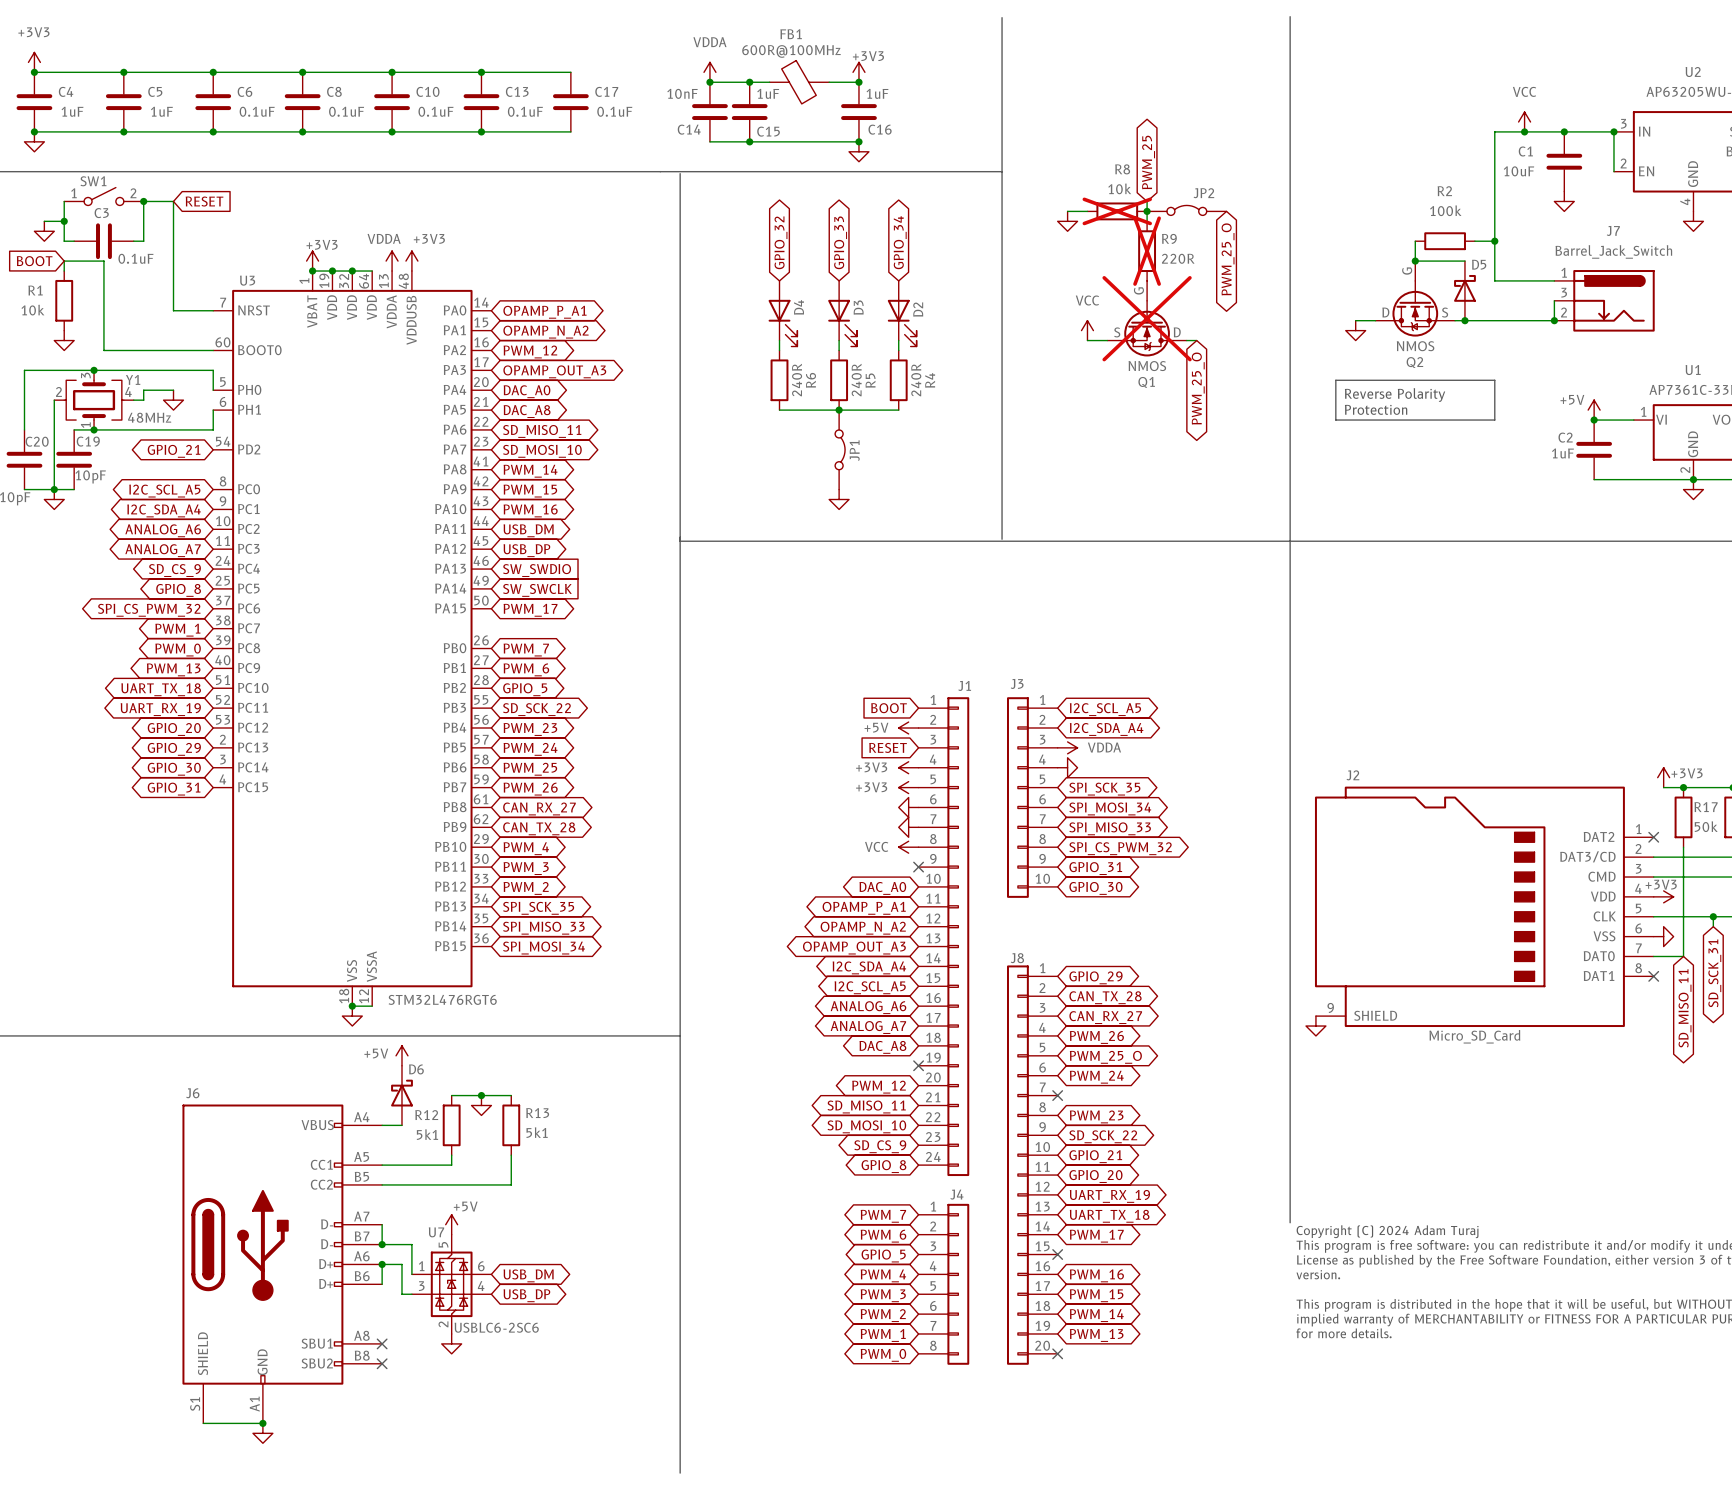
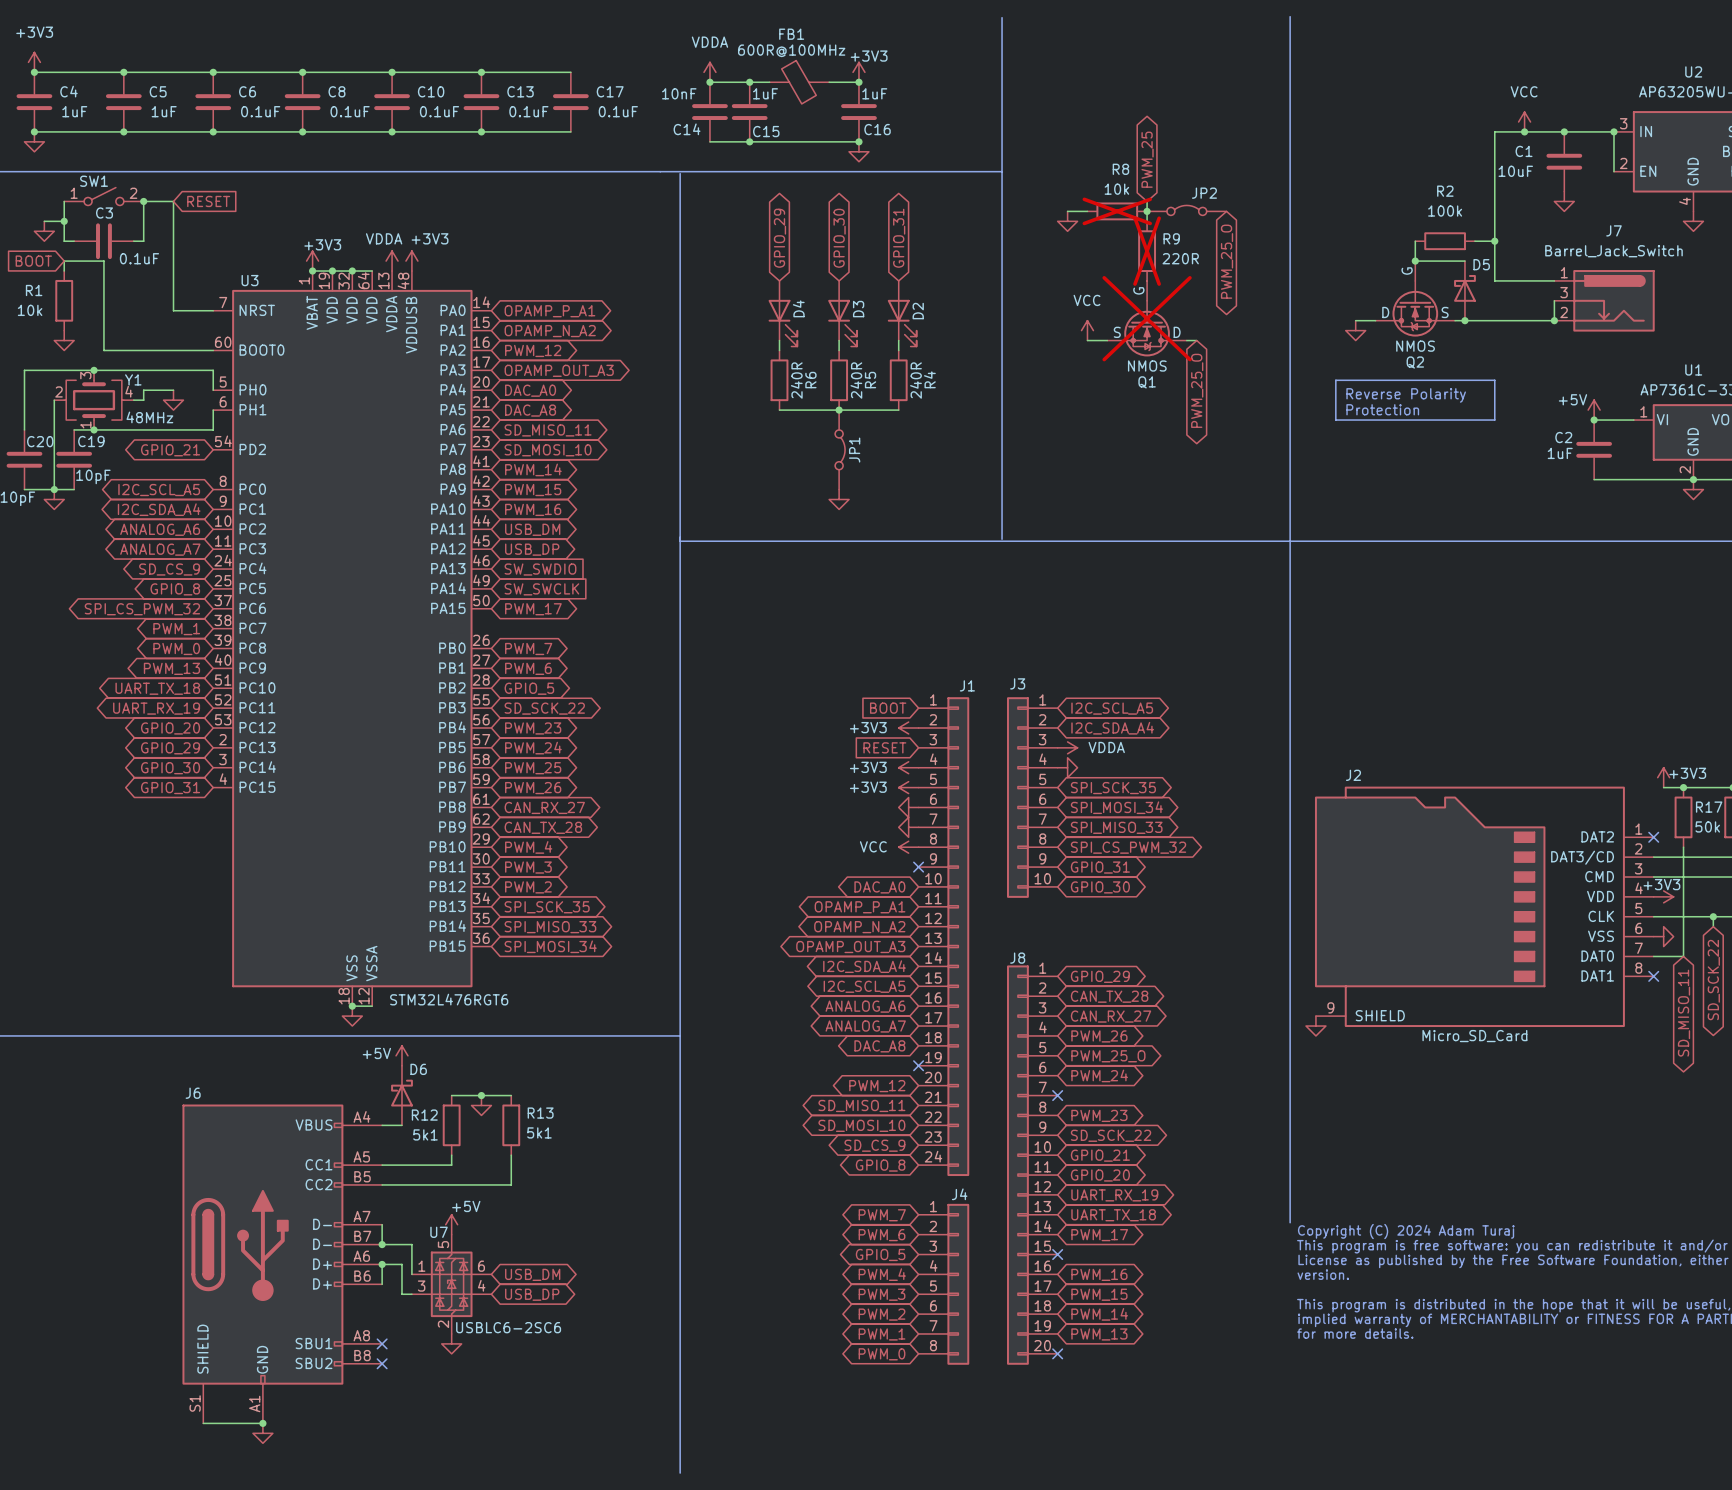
global label: GPIO_32 (780, 242) -> GPIO_29 (779, 238)
global label: GPIO_33 (840, 242) -> GPIO_30 (839, 238)
global label: GPIO_34 (900, 242) -> GPIO_31 (899, 238)
power symbol: +5V (908, 727) -> +3V3 (908, 727)
global label: SD_SCK_31 (1714, 973) -> SD_SCK_22 (1713, 980)

